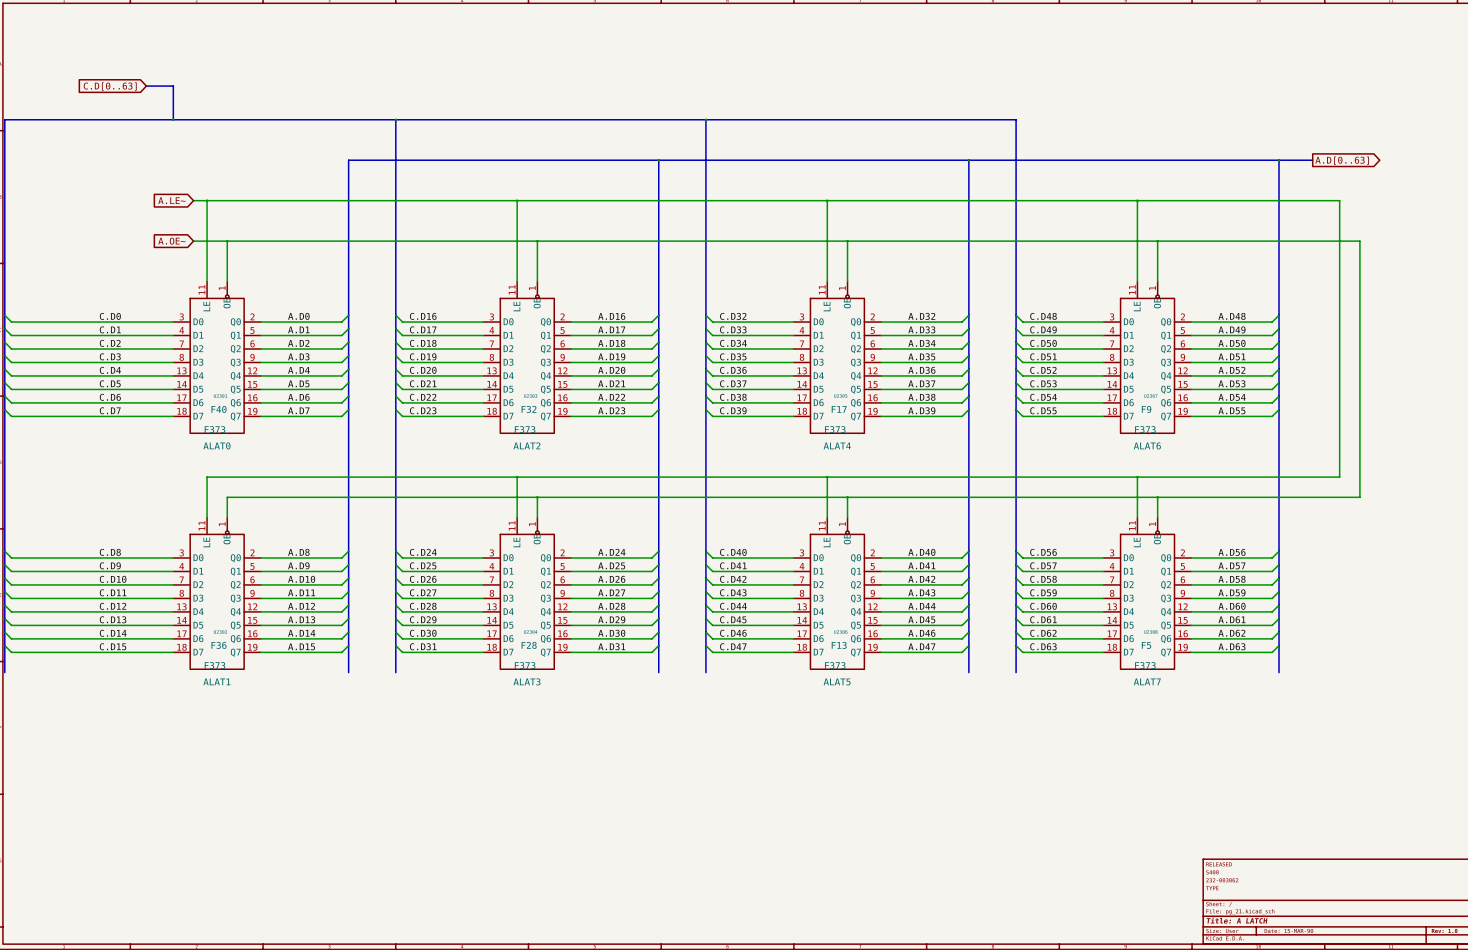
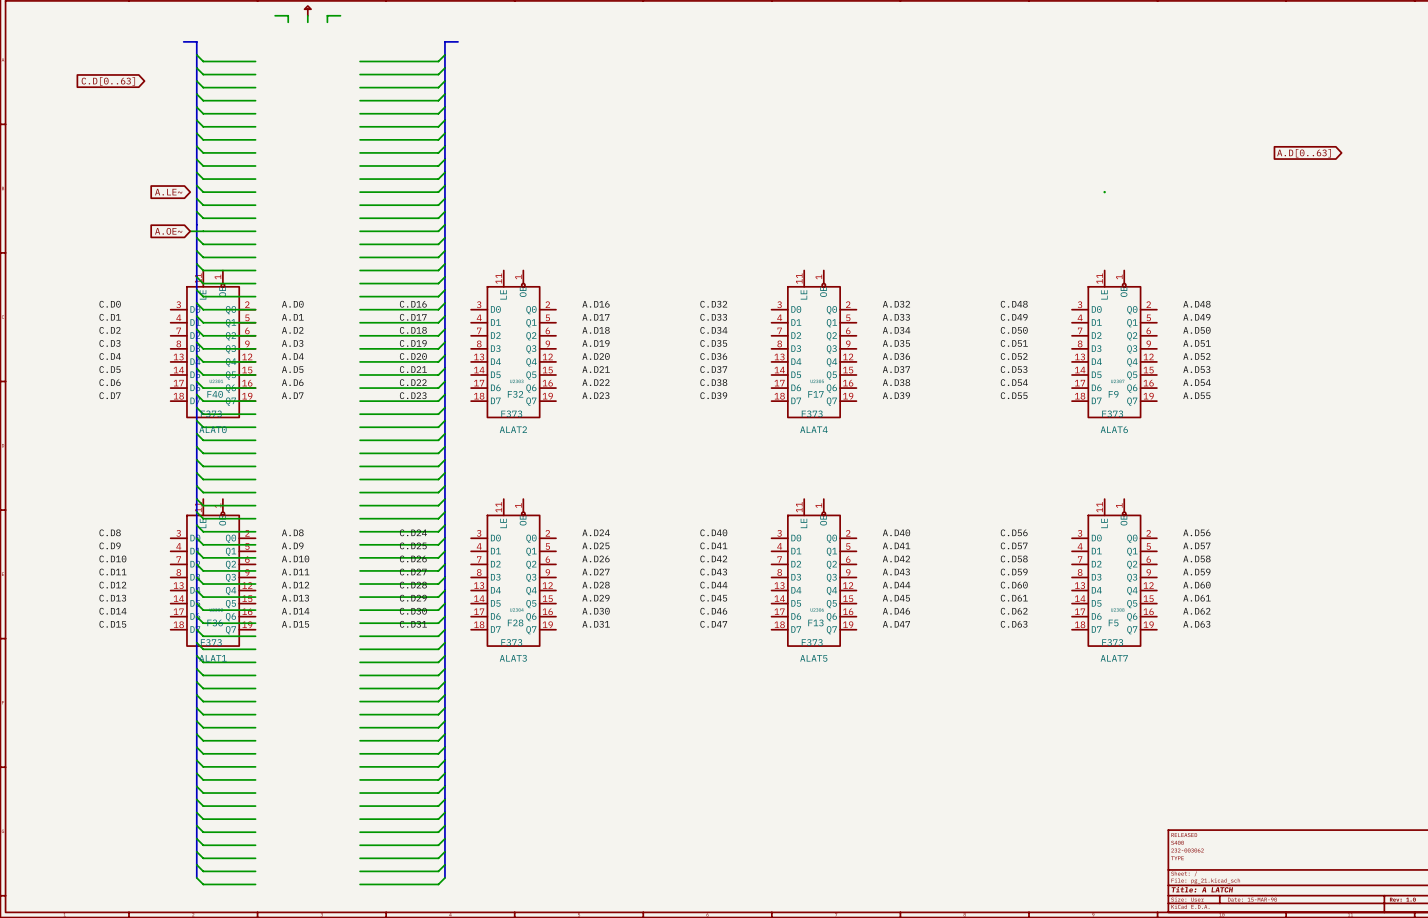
power symbol: none -> (307, 10)
wire: none -> (275, 15) (288, 15) (288, 22)
wire: none -> (307, 15) (307, 22)
wire: none -> (340, 15) (327, 15) (327, 22)
bus: none -> (183, 41) (196, 41) (196, 877)
bus: none -> (458, 41) (444, 41) (444, 877)
wire: none -> (196, 54) (203, 61) (255, 61)
wire: none -> (444, 54) (438, 61) (360, 61)
wire: none -> (196, 68) (203, 74) (255, 74)
wire: none -> (444, 68) (438, 74) (360, 74)
bus: (146, 86) (173, 86) (173, 119) -> none
wire: none -> (196, 81) (203, 87) (255, 87)
wire: none -> (444, 81) (438, 87) (360, 87)
wire: none -> (196, 94) (203, 100) (255, 100)
wire: none -> (444, 94) (438, 100) (360, 100)
junction: (173, 119) -> none
bus: (395, 119) (395, 672) -> none
junction: (395, 119) -> none
bus: (705, 119) (705, 672) -> none
junction: (705, 119) -> none
wire: none -> (196, 120) (203, 126) (255, 126)
wire: none -> (444, 120) (438, 126) (360, 126)
wire: none -> (196, 133) (203, 139) (255, 139)
wire: none -> (444, 133) (438, 139) (360, 139)
wire: none -> (196, 146) (203, 152) (255, 152)
bus: (658, 160) (658, 672) -> none
junction: (658, 160) -> none
bus: (968, 160) (968, 672) -> none
junction: (968, 160) -> none
bus: (1279, 160) (1279, 672) -> none
junction: (1279, 160) -> none
bus: (1312, 160) (348, 160) (348, 672) -> none
wire: none -> (196, 159) (203, 165) (255, 165)
wire: none -> (444, 159) (438, 165) (360, 165)
wire: none -> (196, 172) (203, 179) (255, 179)
wire: none -> (444, 172) (438, 179) (360, 179)
wire: none -> (196, 185) (203, 192)
wire: (193, 200) (207, 200) (207, 281) -> none
wire: (260, 200) (368, 200) -> none
wire: (449, 200) (1339, 200) (1339, 477) (207, 477) (207, 517) -> (438, 192) (444, 185)
wire: (517, 200) (517, 281) -> none
wire: (827, 200) (827, 281) -> none
wire: (1137, 200) (1137, 281) -> none
wire: none -> (196, 198) (203, 205) (255, 205)
wire: none -> (444, 198) (438, 205) (360, 205)
wire: none -> (196, 211) (203, 218) (255, 218)
wire: none -> (444, 211) (438, 218) (360, 218)
wire: none -> (444, 224) (438, 231)
wire: (227, 241) (227, 281) -> none
wire: (260, 241) (368, 241) -> none
wire: (449, 241) (1359, 241) (1359, 497) (449, 497) -> (444, 472) (438, 479)
wire: (537, 241) (537, 281) -> none
wire: (847, 241) (847, 281) -> none
wire: (1157, 241) (1157, 281) -> none
wire: none -> (196, 237) (203, 244) (255, 244)
wire: none -> (444, 237) (438, 244) (360, 244)
wire: none -> (196, 250) (203, 257) (255, 257)
wire: none -> (444, 250) (438, 257) (360, 257)
wire: none -> (196, 263) (203, 270) (255, 270)
wire: none -> (444, 263) (438, 270) (360, 270)
wire: none -> (196, 277) (203, 283) (255, 283)
wire: none -> (444, 277) (438, 283) (360, 283)
wire: none -> (196, 290) (203, 296) (255, 296)
wire: none -> (444, 290) (438, 296) (360, 296)
wire: (4, 315) (11, 322) (173, 322) -> none
wire: (348, 315) (341, 322) (260, 322) -> (196, 303) (203, 309) (255, 309)
wire: (395, 315) (402, 322) -> (360, 309) (392, 309)
wire: (658, 315) (652, 322) (571, 322) -> none
wire: (705, 315) (712, 322) (793, 322) -> none
wire: (968, 315) (962, 322) (881, 322) -> none
wire: (1016, 315) (1022, 322) (1103, 322) -> none
wire: (1279, 315) (1272, 322) (1191, 322) -> none
wire: (449, 322) (483, 322) -> (438, 309) (444, 303)
wire: (4, 328) (11, 335) (173, 335) -> none
wire: (348, 328) (341, 335) (260, 335) -> (196, 316) (203, 322) (255, 322)
wire: (395, 328) (402, 335) -> (360, 322) (392, 322)
wire: (658, 328) (652, 335) (571, 335) -> none
wire: (705, 328) (712, 335) (793, 335) -> none
wire: (968, 328) (962, 335) (881, 335) -> none
wire: (1016, 328) (1022, 335) (1103, 335) -> none
wire: (1279, 328) (1272, 335) (1191, 335) -> none
wire: (449, 335) (483, 335) -> (438, 322) (444, 316)
wire: (4, 342) (11, 348) (173, 348) -> none
wire: (348, 342) (341, 348) (260, 348) -> (196, 329) (203, 335) (255, 335)
wire: (395, 342) (402, 348) -> (360, 335) (392, 335)
wire: (658, 342) (652, 348) (571, 348) -> none
wire: (705, 342) (712, 348) (793, 348) -> none
wire: (968, 342) (962, 348) (881, 348) -> none
wire: (1016, 342) (1022, 348) (1103, 348) -> none
wire: (1279, 342) (1272, 348) (1191, 348) -> none
wire: (449, 348) (483, 348) -> (438, 335) (444, 329)
wire: (4, 355) (11, 362) (173, 362) -> none
wire: (348, 355) (341, 362) (260, 362) -> (196, 342) (203, 348) (255, 348)
wire: (395, 355) (402, 362) -> (360, 348) (392, 348)
wire: (658, 355) (652, 362) (571, 362) -> none
wire: (705, 355) (712, 362) (793, 362) -> none
wire: (968, 355) (962, 362) (881, 362) -> none
wire: (1016, 355) (1022, 362) (1103, 362) -> none
wire: (1279, 355) (1272, 362) (1191, 362) -> none
wire: (449, 362) (483, 362) -> (438, 348) (444, 342)
wire: (4, 369) (11, 375) (173, 375) -> none
wire: (348, 369) (341, 375) (260, 375) -> (196, 355) (203, 361) (255, 361)
wire: (395, 369) (402, 375) -> (360, 361) (392, 361)
wire: (658, 369) (652, 375) (571, 375) -> none
wire: (705, 369) (712, 375) (793, 375) -> none
wire: (968, 369) (962, 375) (881, 375) -> none
wire: (1016, 369) (1022, 375) (1103, 375) -> none
wire: (1279, 369) (1272, 375) (1191, 375) -> none
wire: (449, 375) (483, 375) -> (438, 361) (444, 355)
wire: (4, 382) (11, 389) (173, 389) -> none
wire: (348, 382) (341, 389) (260, 389) -> (196, 368) (203, 375) (255, 375)
wire: (395, 382) (402, 389) -> (360, 375) (392, 375)
wire: (658, 382) (652, 389) (571, 389) -> none
wire: (705, 382) (712, 389) (793, 389) -> none
wire: (968, 382) (962, 389) (881, 389) -> none
wire: (1016, 382) (1022, 389) (1103, 389) -> none
wire: (1279, 382) (1272, 389) (1191, 389) -> none
wire: (449, 389) (483, 389) -> (438, 375) (444, 368)
wire: (4, 396) (11, 402) (173, 402) -> none
wire: (348, 396) (341, 402) (260, 402) -> (196, 381) (203, 388) (255, 388)
wire: (395, 396) (402, 402) -> (360, 388) (392, 388)
wire: (658, 396) (652, 402) (571, 402) -> none
wire: (705, 396) (712, 402) (793, 402) -> none
wire: (968, 396) (962, 402) (881, 402) -> none
wire: (1016, 396) (1022, 402) (1103, 402) -> none
wire: (1279, 396) (1272, 402) (1191, 402) -> none
wire: (449, 402) (483, 402) -> (438, 388) (444, 381)
wire: (4, 409) (11, 416) (173, 416) -> none
wire: (348, 409) (341, 416) (260, 416) -> (196, 394) (203, 401) (255, 401)
wire: (395, 409) (402, 416) -> (360, 401) (392, 401)
wire: (658, 409) (652, 416) (571, 416) -> none
wire: (705, 409) (712, 416) (793, 416) -> none
wire: (968, 409) (962, 416) (881, 416) -> none
wire: (1016, 409) (1022, 416) (1103, 416) -> none
wire: (1279, 409) (1272, 416) (1191, 416) -> none
wire: (449, 416) (483, 416) -> (438, 401) (444, 394)
wire: none -> (196, 407) (203, 414) (255, 414)
wire: none -> (444, 407) (438, 414) (360, 414)
wire: none -> (196, 420) (203, 427) (255, 427)
wire: none -> (444, 420) (438, 427) (360, 427)
wire: none -> (196, 433) (203, 440) (255, 440)
wire: none -> (444, 433) (438, 440) (360, 440)
wire: none -> (196, 446) (203, 453) (255, 453)
wire: none -> (444, 446) (438, 453) (360, 453)
wire: none -> (196, 459) (203, 466) (255, 466)
wire: none -> (444, 459) (438, 466) (360, 466)
wire: (517, 477) (517, 517) -> none
wire: (827, 477) (827, 517) -> none
wire: (1137, 477) (1137, 517) -> none
wire: (227, 497) (227, 517) -> (222, 479) (203, 479) (196, 472)
wire: (260, 497) (368, 497) -> none
wire: (537, 497) (537, 517) -> none
wire: (847, 497) (847, 517) -> none
wire: (1157, 497) (1157, 517) -> none
wire: none -> (196, 486) (203, 492) (255, 492)
wire: none -> (444, 486) (438, 492) (360, 492)
wire: none -> (196, 499) (203, 505) (255, 505)
wire: none -> (444, 499) (438, 505) (360, 505)
wire: none -> (196, 512) (203, 518) (255, 518)
wire: none -> (444, 512) (438, 518) (360, 518)
wire: none -> (196, 525) (203, 531) (255, 531)
wire: none -> (444, 525) (438, 531) (360, 531)
wire: (4, 551) (11, 557) (173, 557) -> none
wire: (348, 551) (341, 557) (260, 557) -> none
wire: (395, 551) (402, 557) (483, 557) -> none
wire: (658, 551) (652, 557) (571, 557) -> none
wire: (705, 551) (712, 557) (793, 557) -> none
wire: (968, 551) (962, 557) (881, 557) -> none
wire: (1016, 551) (1022, 557) (1103, 557) -> none
wire: (1279, 551) (1272, 557) (1191, 557) -> none
wire: none -> (196, 538) (203, 544) (255, 544)
wire: none -> (444, 538) (438, 544) (360, 544)
wire: (4, 564) (11, 571) (173, 571) -> none
wire: (348, 564) (341, 571) (260, 571) -> none
wire: (395, 564) (402, 571) (483, 571) -> none
wire: (658, 564) (652, 571) (571, 571) -> none
wire: (705, 564) (712, 571) (793, 571) -> none
wire: (968, 564) (962, 571) (881, 571) -> none
wire: (1016, 564) (1022, 571) (1103, 571) -> none
wire: (1279, 564) (1272, 571) (1191, 571) -> none
wire: none -> (196, 551) (203, 557) (255, 557)
wire: none -> (444, 551) (438, 557) (360, 557)
wire: (4, 578) (11, 584) (173, 584) -> none
wire: (348, 578) (341, 584) (260, 584) -> none
wire: (395, 578) (402, 584) (483, 584) -> none
wire: (658, 578) (652, 584) (571, 584) -> none
wire: (705, 578) (712, 584) (793, 584) -> none
wire: (968, 578) (962, 584) (881, 584) -> none
wire: (1016, 578) (1022, 584) (1103, 584) -> none
wire: (1279, 578) (1272, 584) (1191, 584) -> none
wire: none -> (196, 564) (203, 570) (255, 570)
wire: none -> (444, 564) (438, 570) (360, 570)
wire: (4, 591) (11, 598) (173, 598) -> none
wire: (348, 591) (341, 598) (260, 598) -> none
wire: (395, 591) (402, 598) (483, 598) -> none
wire: (658, 591) (652, 598) (571, 598) -> none
wire: (705, 591) (712, 598) (793, 598) -> none
wire: (968, 591) (962, 598) (881, 598) -> none
wire: (1016, 591) (1022, 598) (1103, 598) -> none
wire: (1279, 591) (1272, 598) (1191, 598) -> none
wire: none -> (196, 577) (203, 584) (255, 584)
wire: none -> (444, 577) (438, 584) (360, 584)
wire: (4, 605) (11, 611) (173, 611) -> none
wire: (348, 605) (341, 611) (260, 611) -> none
wire: (395, 605) (402, 611) (483, 611) -> none
wire: (658, 605) (652, 611) (571, 611) -> none
wire: (705, 605) (712, 611) (793, 611) -> none
wire: (968, 605) (962, 611) (881, 611) -> none
wire: (1016, 605) (1022, 611) (1103, 611) -> none
wire: (1279, 605) (1272, 611) (1191, 611) -> none
wire: none -> (196, 590) (203, 597) (255, 597)
wire: none -> (444, 590) (438, 597) (360, 597)
wire: (4, 618) (11, 625) (173, 625) -> none
wire: (348, 618) (341, 625) (260, 625) -> none
wire: (395, 618) (402, 625) (483, 625) -> none
wire: (658, 618) (652, 625) (571, 625) -> none
wire: (705, 618) (712, 625) (793, 625) -> none
wire: (968, 618) (962, 625) (881, 625) -> none
wire: (1016, 618) (1022, 625) (1103, 625) -> none
wire: (1279, 618) (1272, 625) (1191, 625) -> none
wire: none -> (196, 603) (203, 610) (255, 610)
wire: none -> (444, 603) (438, 610) (360, 610)
wire: (4, 632) (11, 638) (173, 638) -> none
wire: (348, 632) (341, 638) (260, 638) -> none
wire: (395, 632) (402, 638) (483, 638) -> none
wire: (658, 632) (652, 638) (571, 638) -> none
wire: (705, 632) (712, 638) (793, 638) -> none
wire: (968, 632) (962, 638) (881, 638) -> none
wire: (1016, 632) (1022, 638) (1103, 638) -> none
wire: (1279, 632) (1272, 638) (1191, 638) -> none
wire: none -> (196, 616) (203, 623) (255, 623)
wire: none -> (444, 616) (438, 623) (360, 623)
wire: (4, 645) (11, 652) (173, 652) -> none
wire: (348, 645) (341, 652) (260, 652) -> none
wire: (395, 645) (402, 652) (483, 652) -> none
wire: (658, 645) (652, 652) (571, 652) -> none
wire: (705, 645) (712, 652) (793, 652) -> none
wire: (968, 645) (962, 652) (881, 652) -> none
wire: (1016, 645) (1022, 652) (1103, 652) -> none
wire: (1279, 645) (1272, 652) (1191, 652) -> none
wire: none -> (196, 629) (203, 636) (255, 636)
wire: none -> (444, 629) (438, 636) (360, 636)
wire: none -> (196, 642) (203, 649) (255, 649)
wire: none -> (444, 642) (438, 649) (360, 649)
bus: (4, 672) (4, 119) (1016, 119) (1016, 672) -> none
wire: none -> (196, 655) (203, 662) (255, 662)
wire: none -> (444, 655) (438, 662) (360, 662)
wire: none -> (196, 668) (203, 675) (255, 675)
wire: none -> (444, 668) (438, 675) (360, 675)
wire: none -> (196, 681) (203, 688) (255, 688)
wire: none -> (444, 681) (438, 688) (360, 688)
wire: none -> (196, 695) (203, 701) (255, 701)
wire: none -> (444, 695) (438, 701) (360, 701)
wire: none -> (196, 708) (203, 714) (255, 714)
wire: none -> (444, 708) (438, 714) (360, 714)
wire: none -> (196, 721) (203, 727) (255, 727)
wire: none -> (444, 721) (438, 727) (360, 727)
wire: none -> (196, 734) (203, 740) (255, 740)
wire: none -> (444, 734) (438, 740) (360, 740)
wire: none -> (196, 747) (203, 753) (255, 753)
wire: none -> (444, 747) (438, 753) (360, 753)
wire: none -> (196, 760) (203, 766) (255, 766)
wire: none -> (444, 760) (438, 766) (360, 766)
wire: none -> (196, 773) (203, 779) (255, 779)
wire: none -> (444, 773) (438, 779) (360, 779)
wire: none -> (196, 786) (203, 793) (255, 793)
wire: none -> (444, 786) (438, 793) (360, 793)
wire: none -> (196, 799) (203, 806) (255, 806)
wire: none -> (444, 799) (438, 806) (360, 806)
wire: none -> (196, 812) (203, 819) (255, 819)
wire: none -> (444, 812) (438, 819) (360, 819)
wire: none -> (196, 825) (203, 832) (255, 832)
wire: none -> (444, 825) (438, 832) (360, 832)
wire: none -> (196, 838) (203, 845) (255, 845)
wire: none -> (444, 838) (438, 845) (360, 845)
wire: none -> (196, 851) (203, 858) (255, 858)
wire: none -> (444, 851) (438, 858) (360, 858)
wire: none -> (196, 864) (203, 871) (255, 871)
wire: none -> (444, 864) (438, 871) (360, 871)
wire: none -> (196, 877) (203, 884) (255, 884)
wire: none -> (444, 877) (438, 884) (360, 884)

